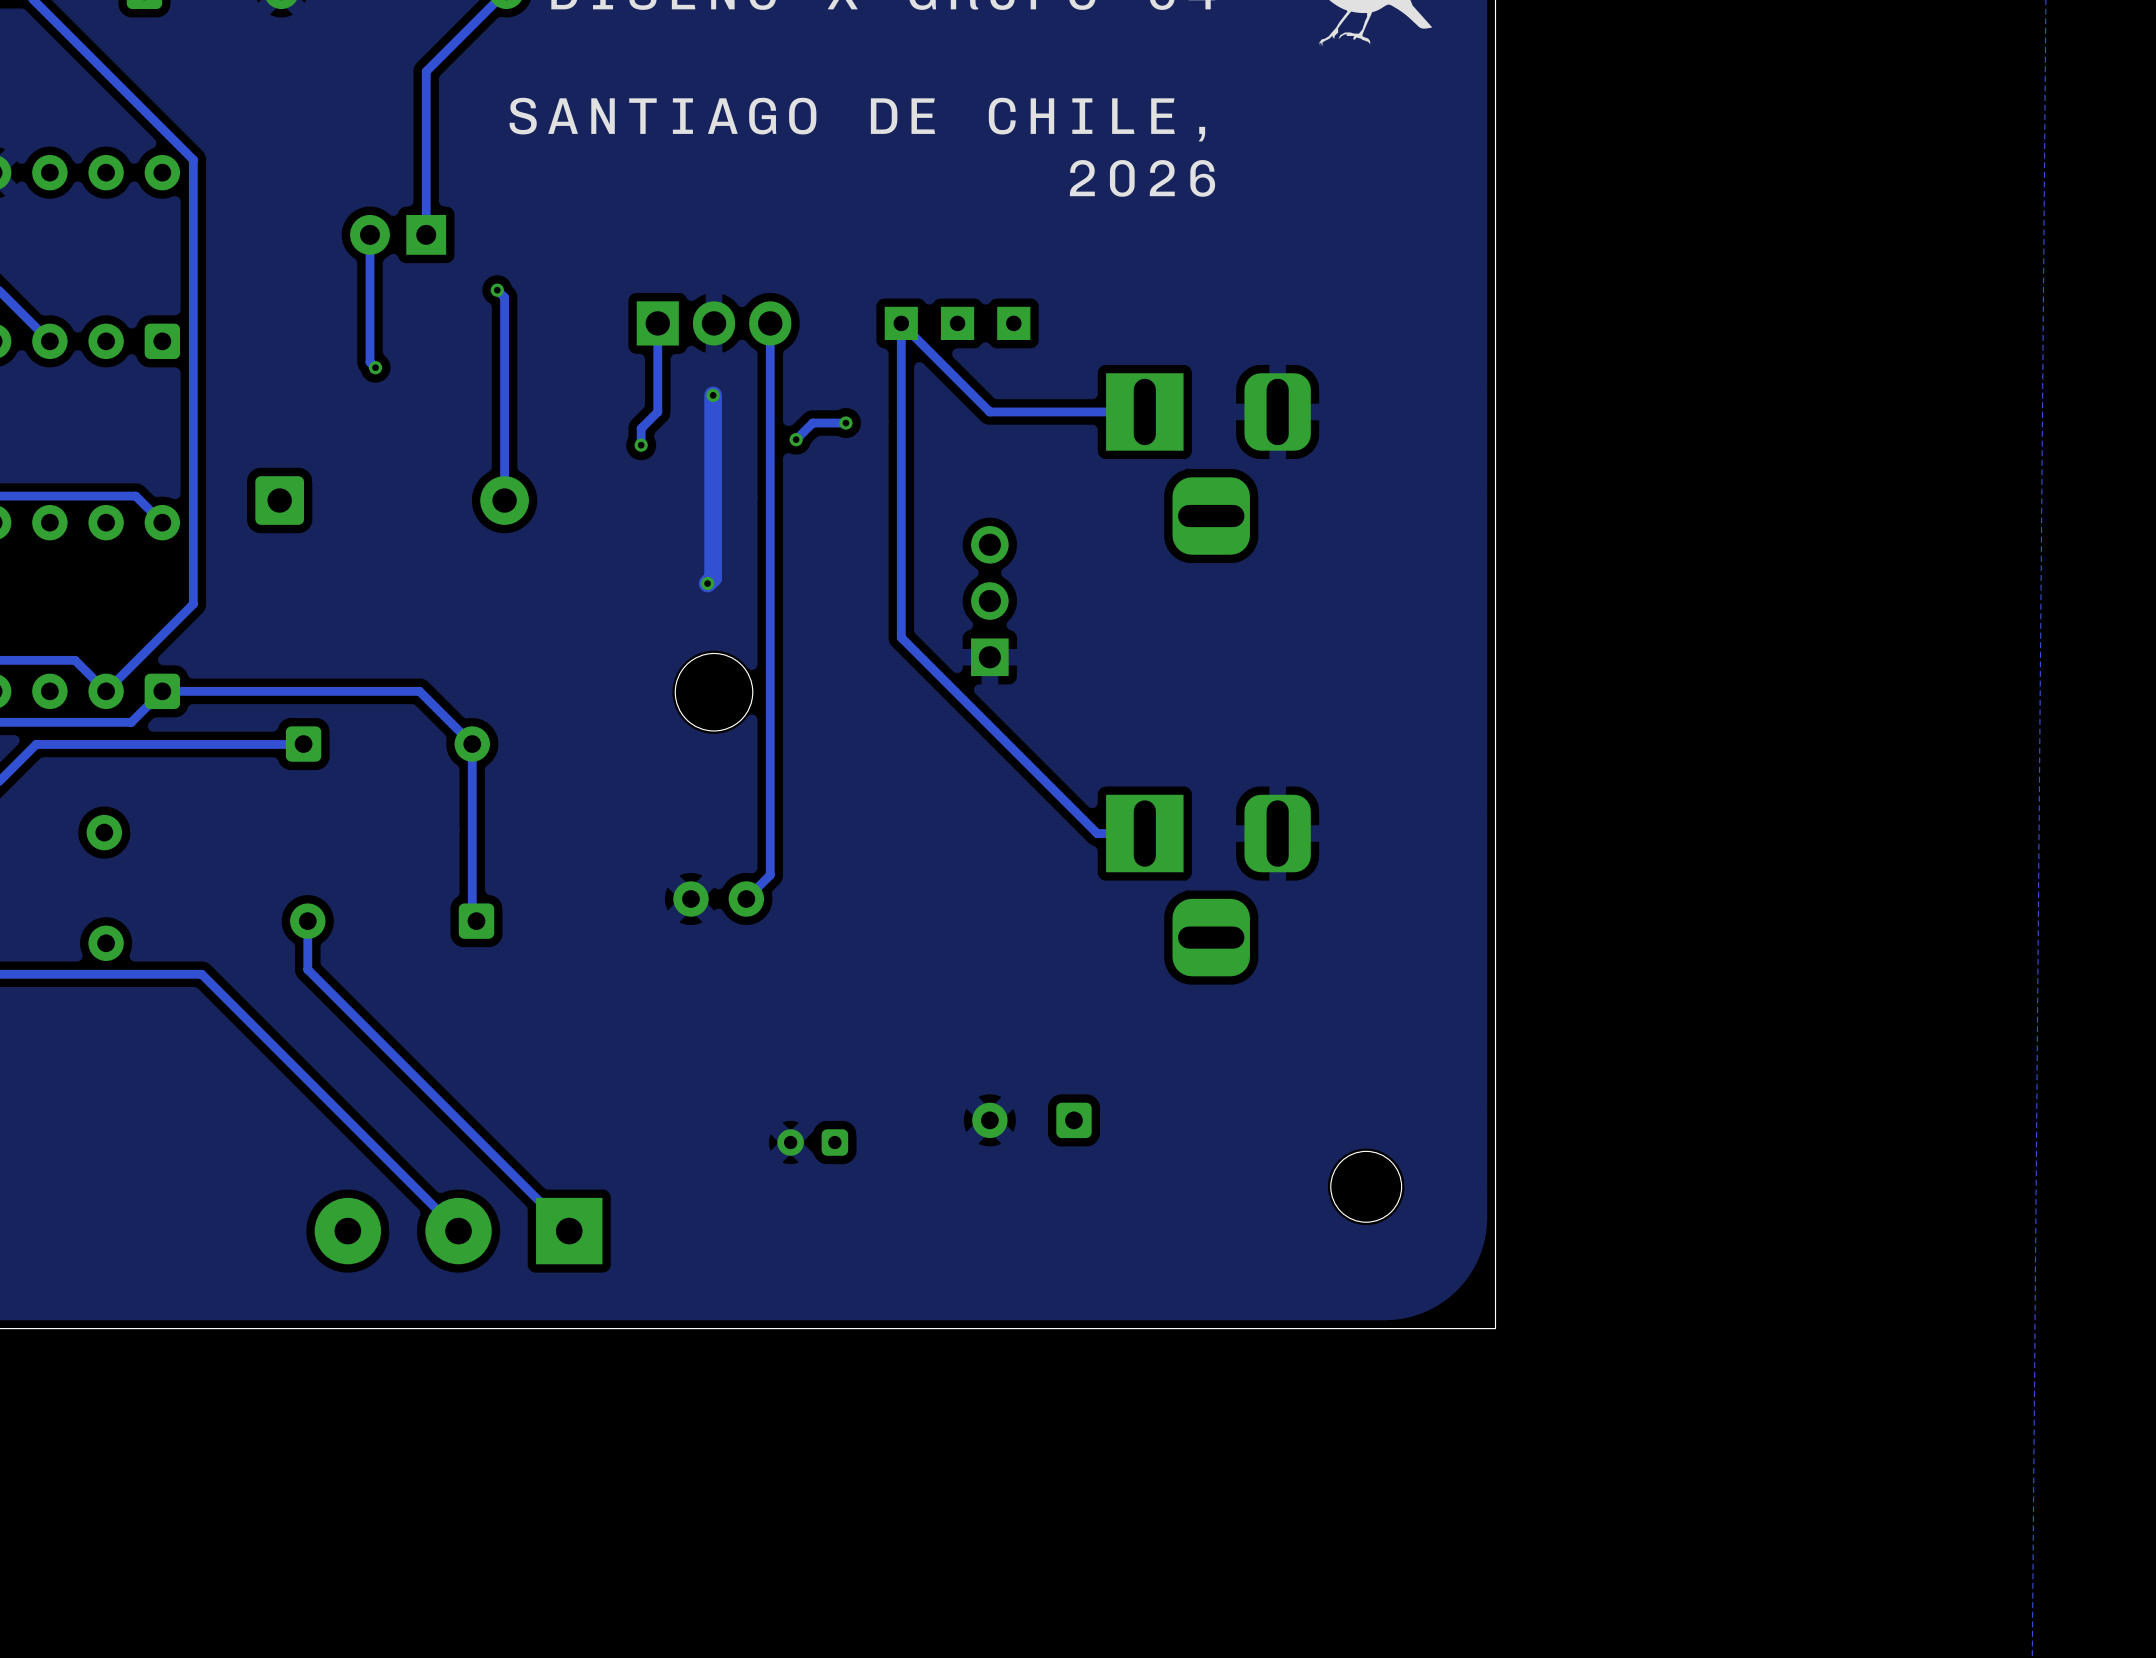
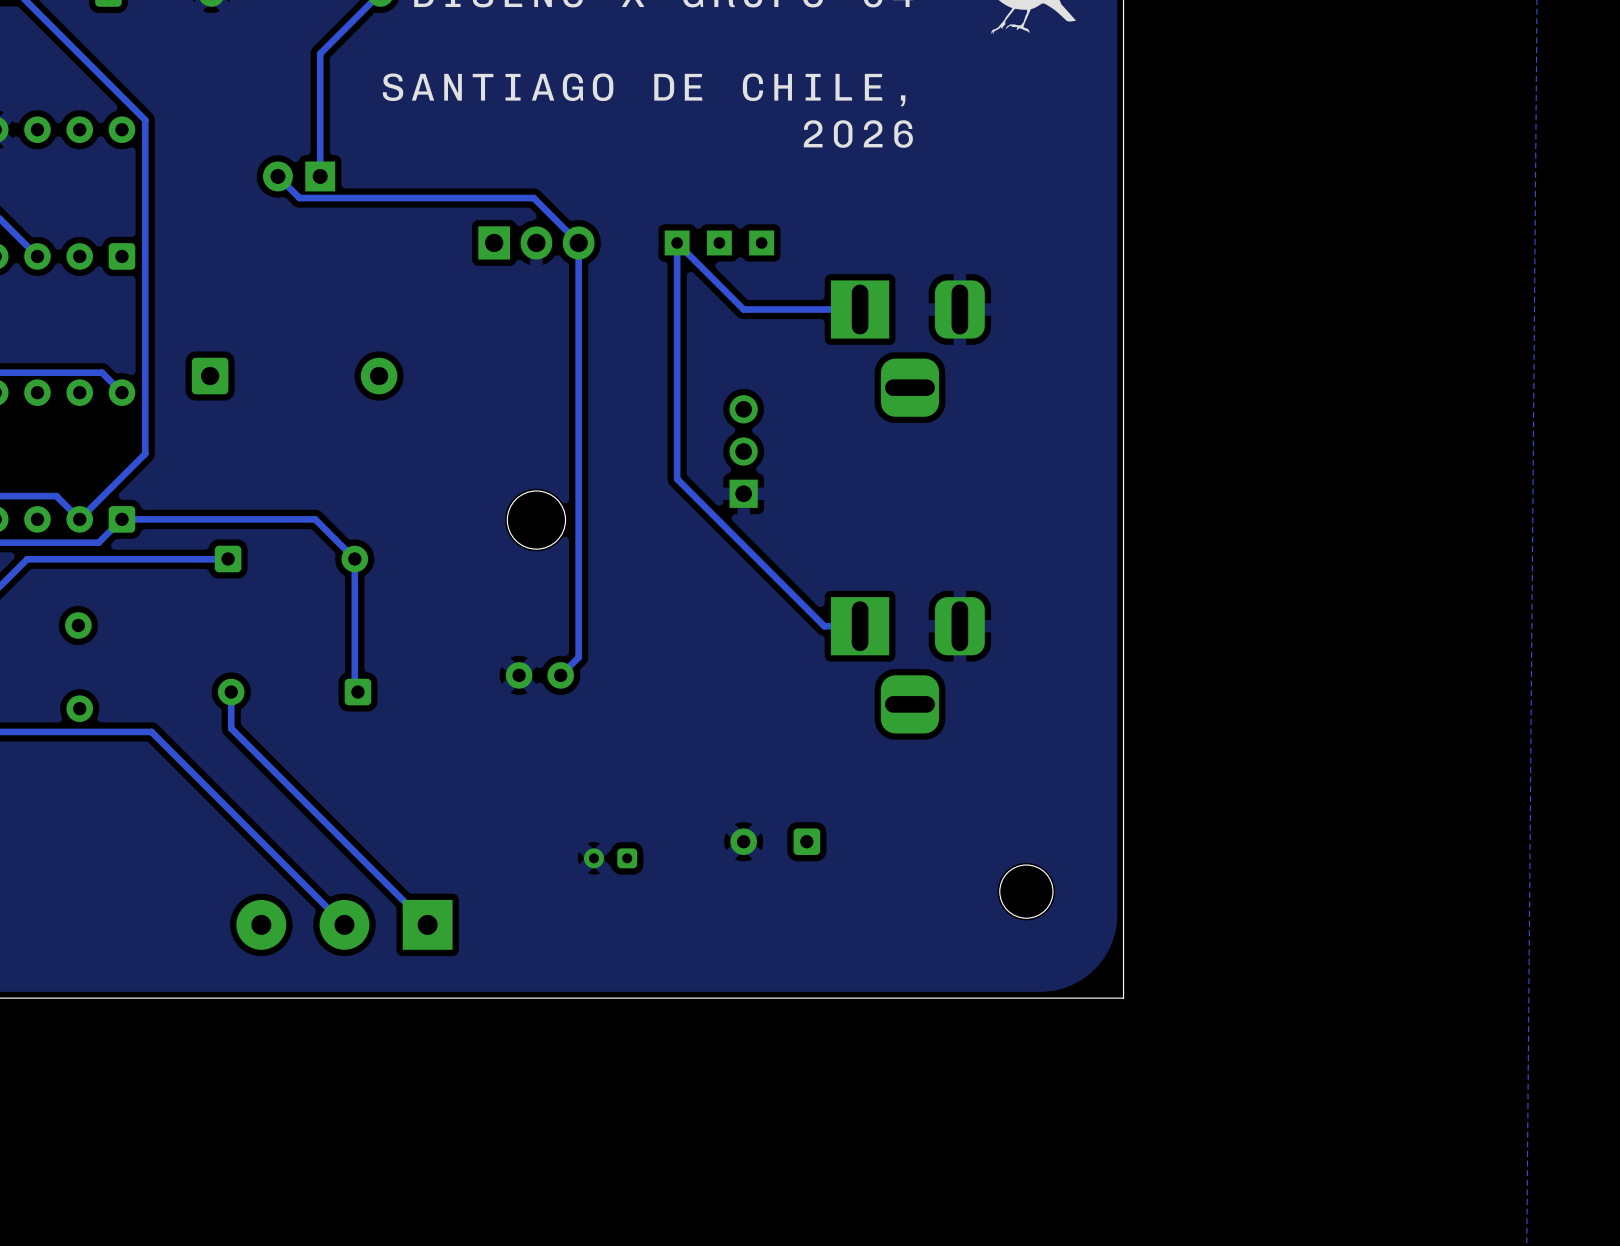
track: (369, 234) (369, 362) (375, 367) -> (277, 176) (299, 198) (533, 198) (578, 242)
track: (497, 290) (504, 297) (504, 500) -> none
via: (497, 290) -> none
track: (657, 323) (657, 411) (641, 428) (641, 445) -> none
via: (375, 367) -> none
track: (713, 395) (713, 578) (707, 583) -> none
via: (713, 395) -> none
track: (845, 423) (812, 423) (796, 439) -> none
via: (845, 423) -> none
via: (796, 439) -> none
via: (641, 445) -> none
via: (707, 583) -> none

